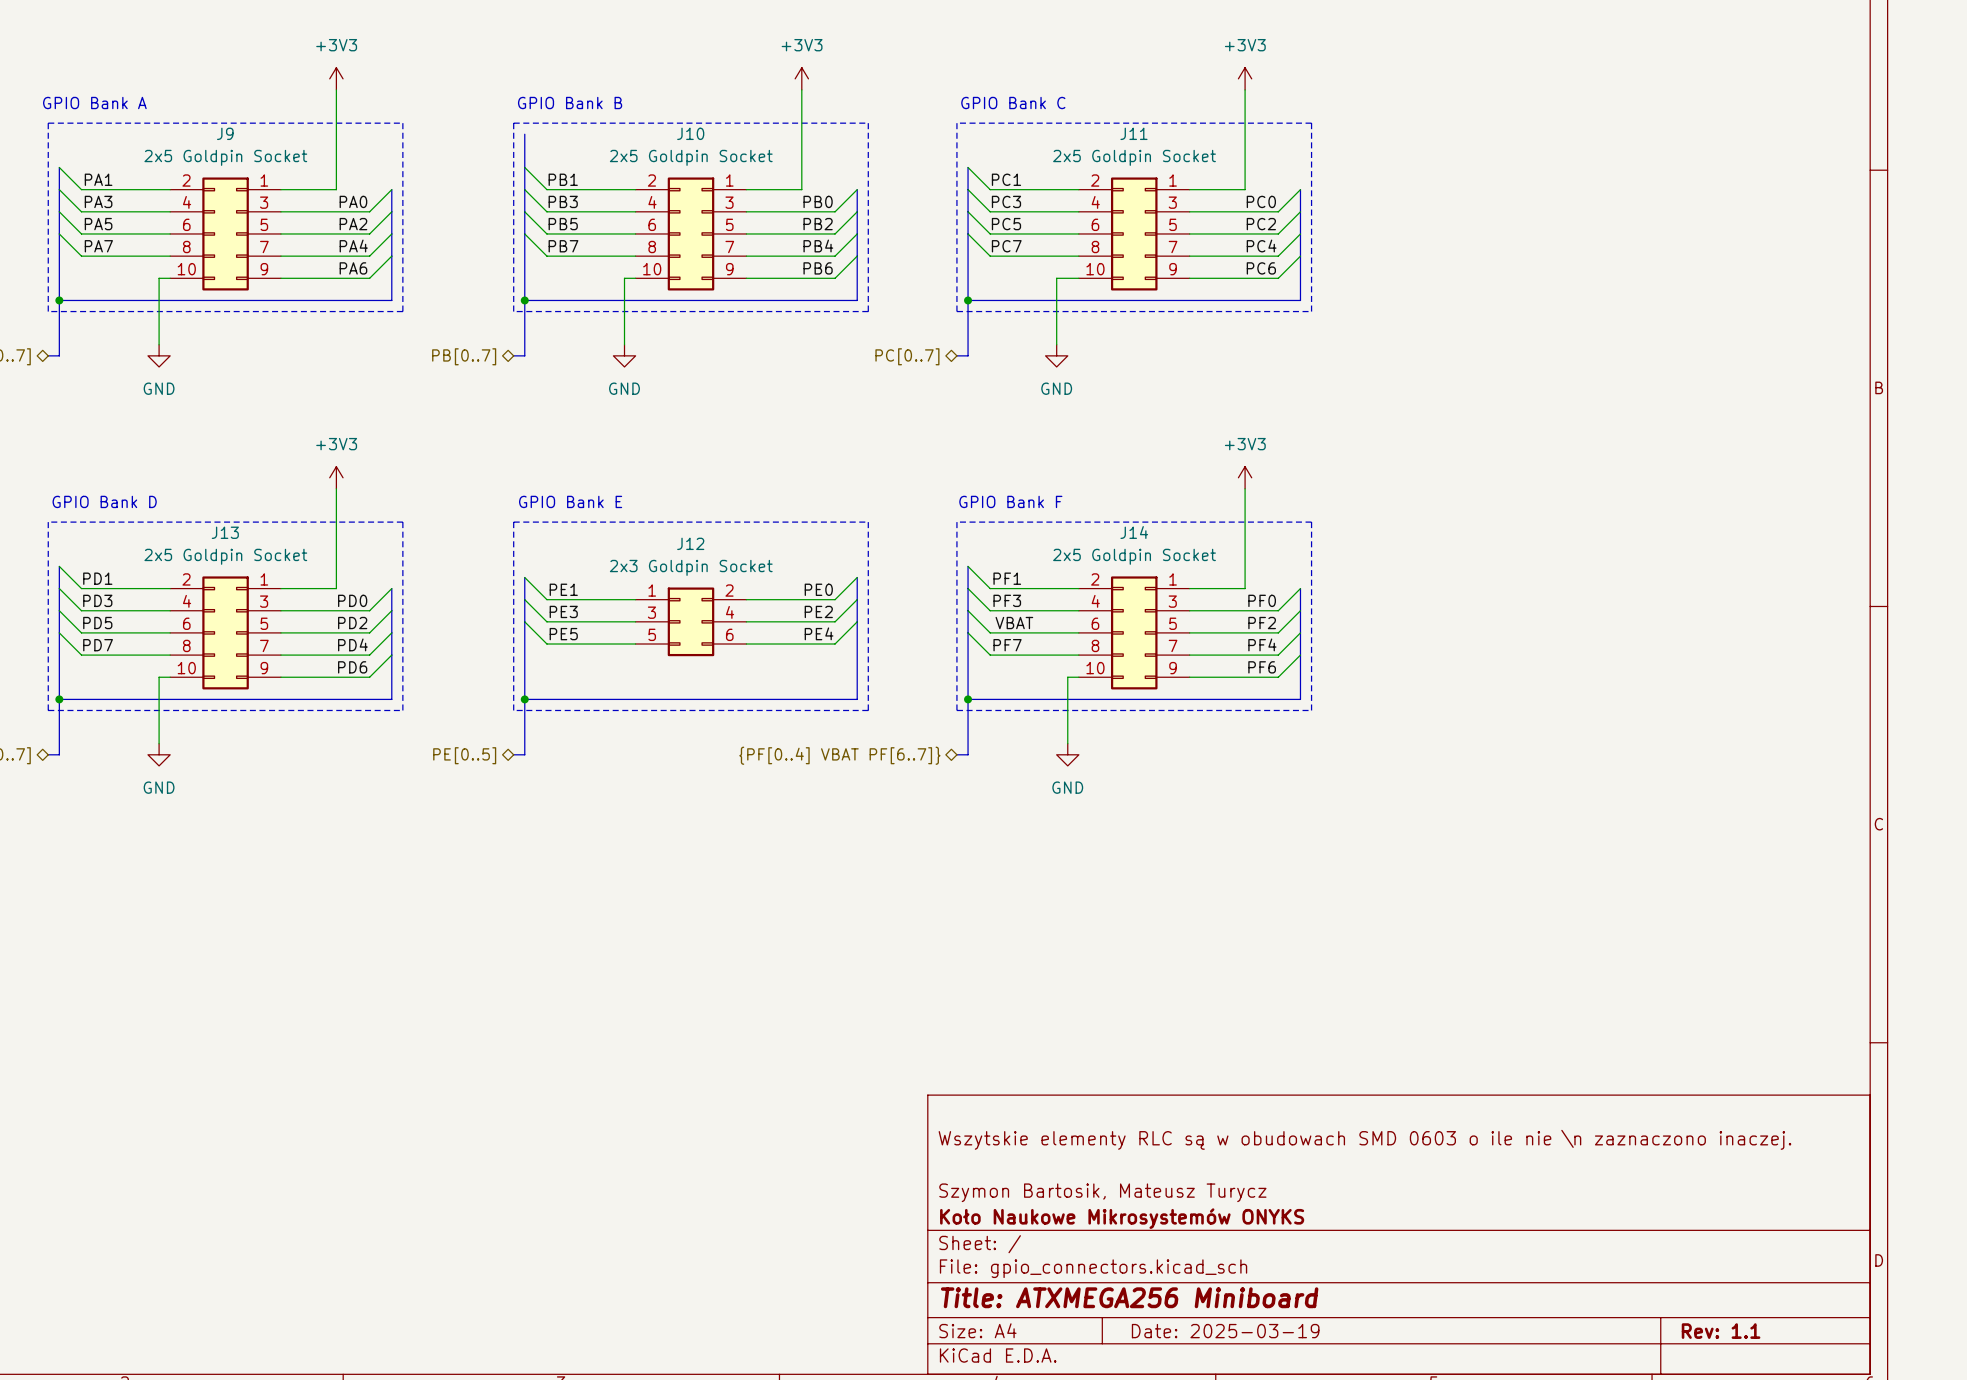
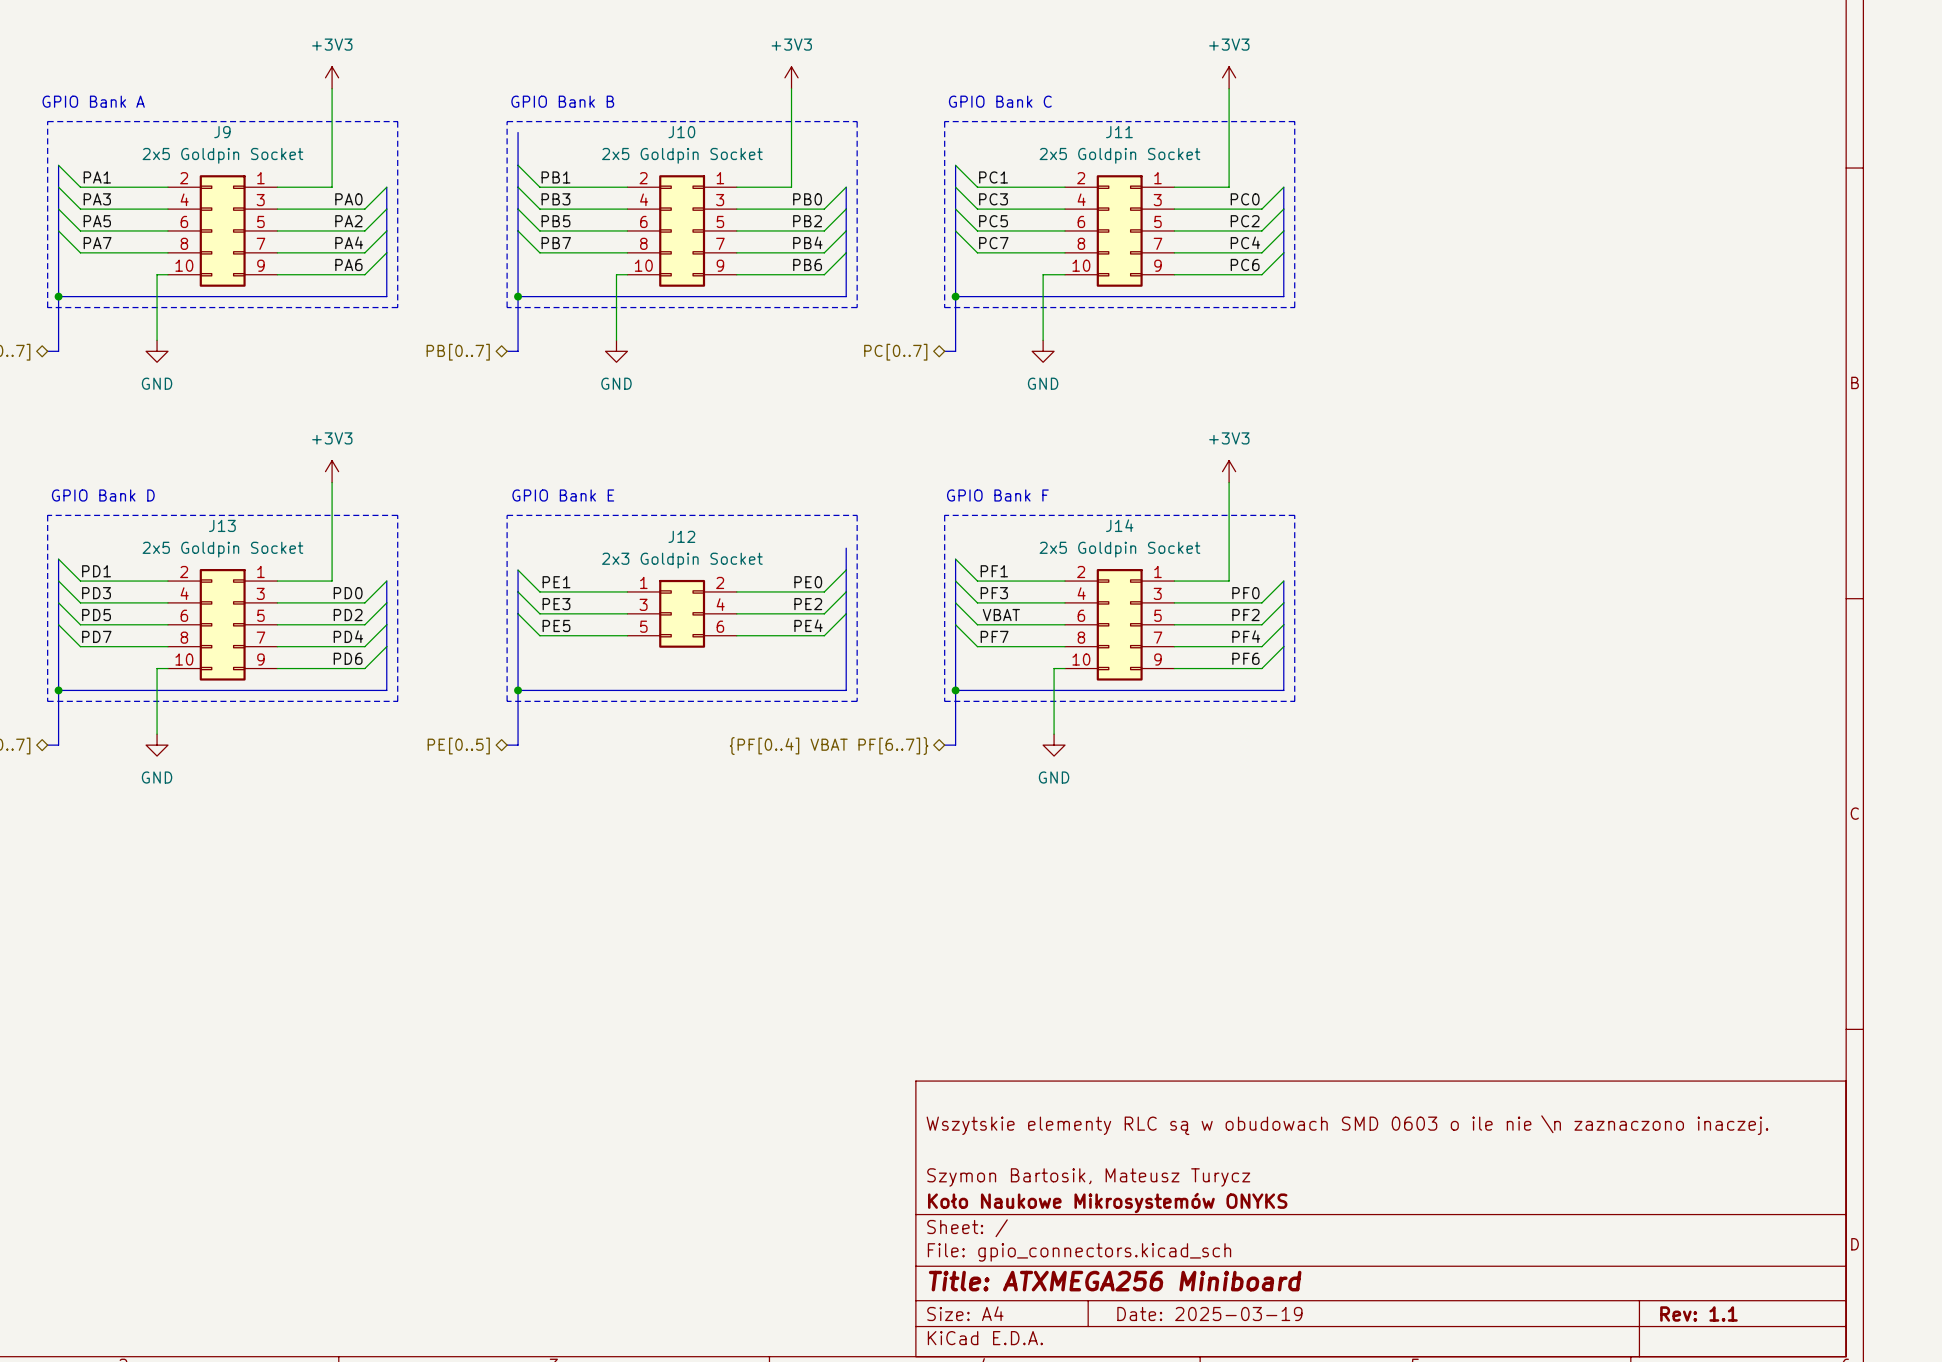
bus: none -> (846, 548) (846, 570)

